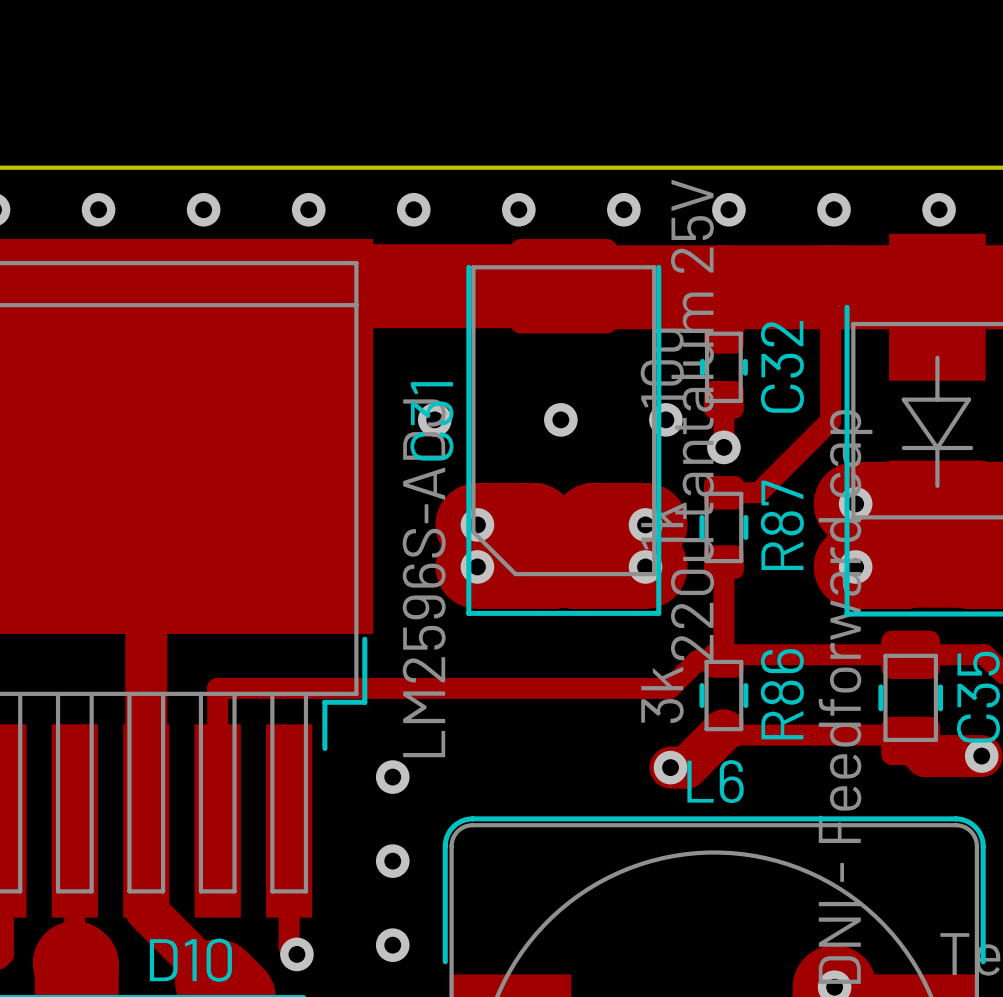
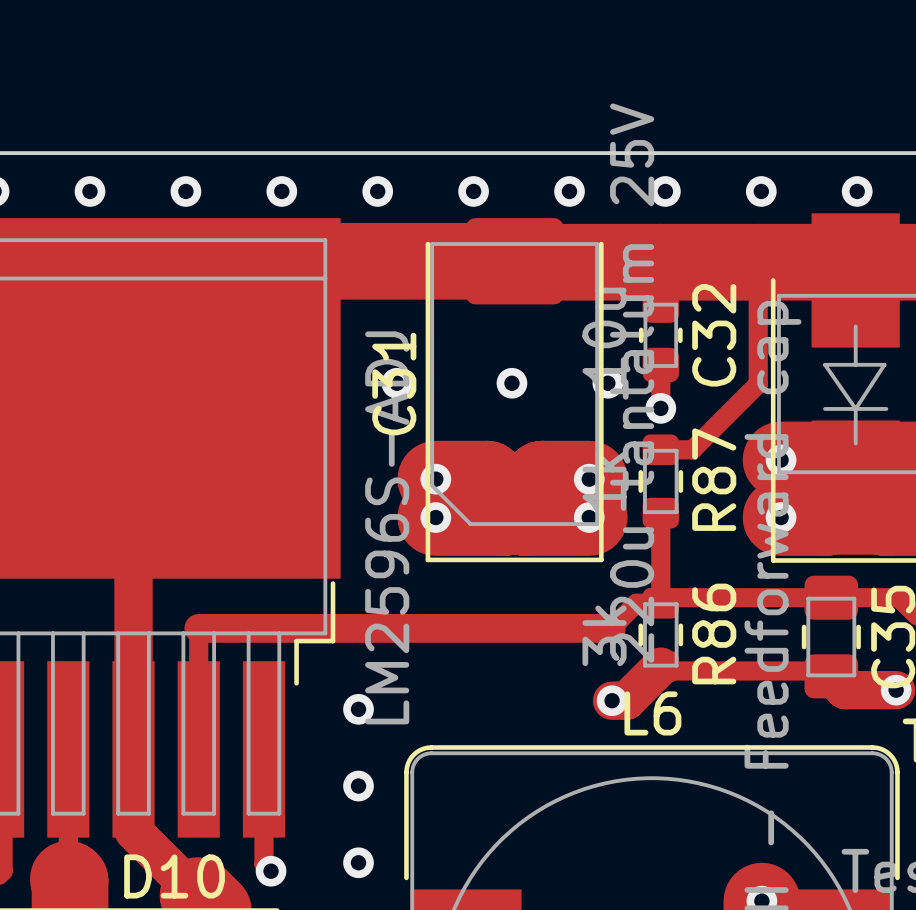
track width: thin (217, 688) (669, 688) -> thick (198, 628) (611, 628)

